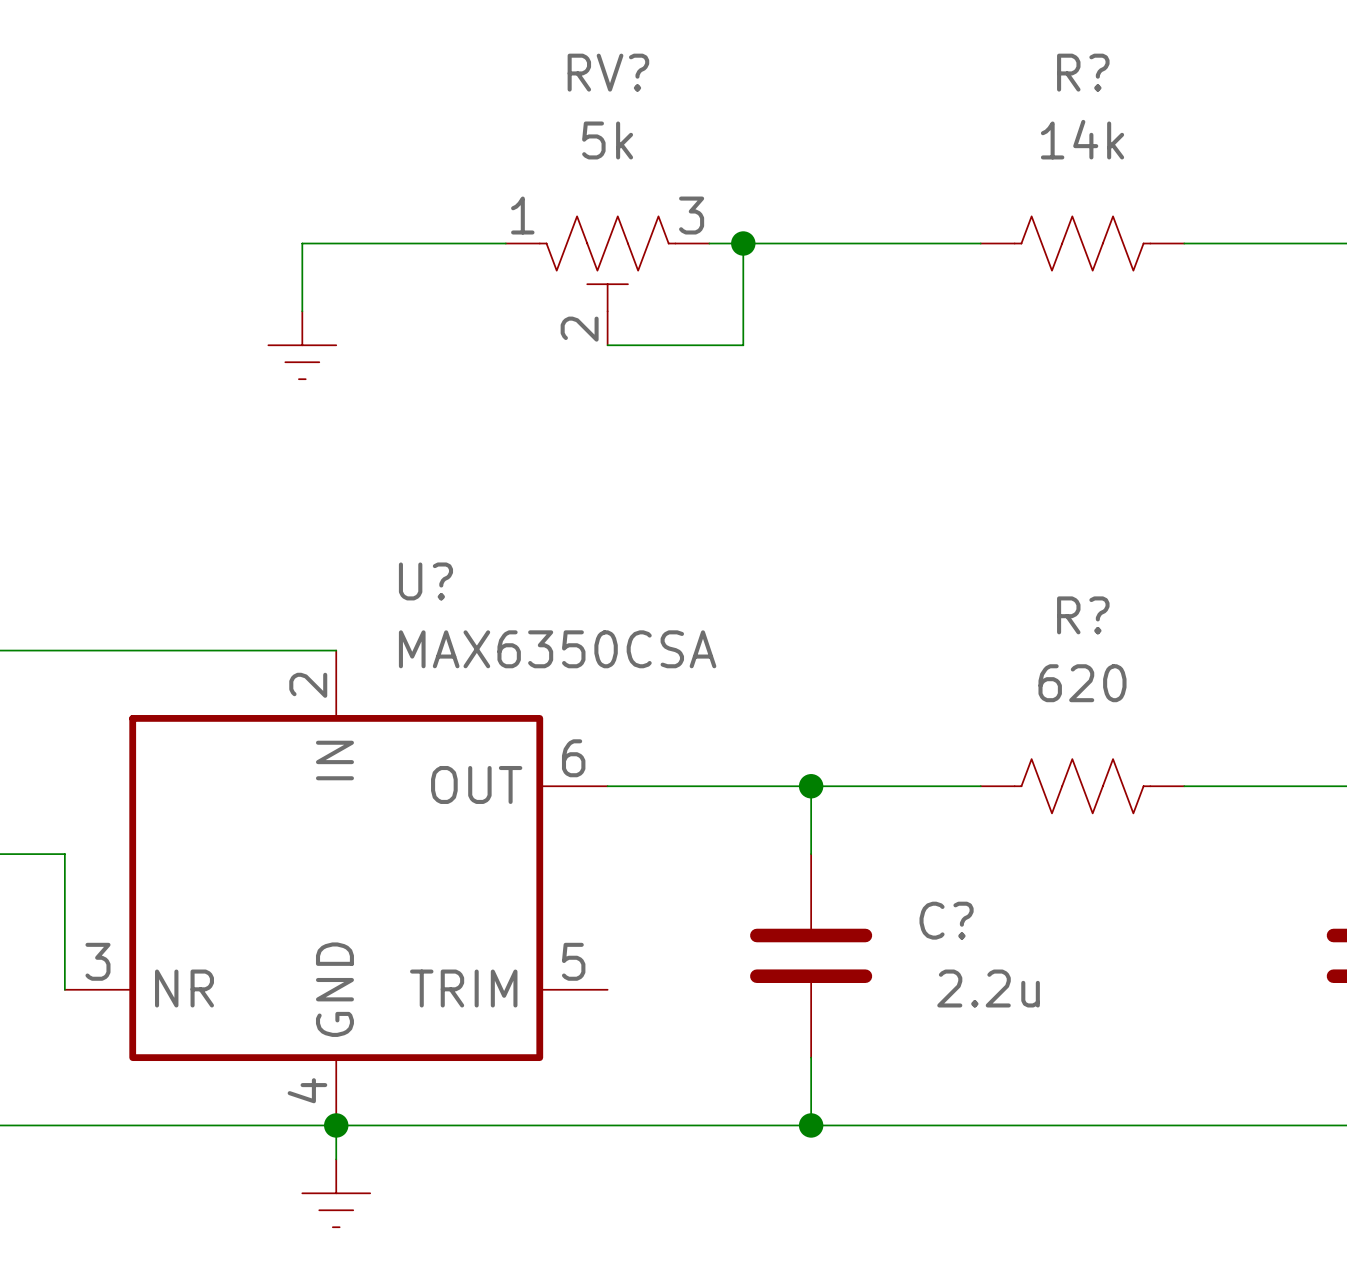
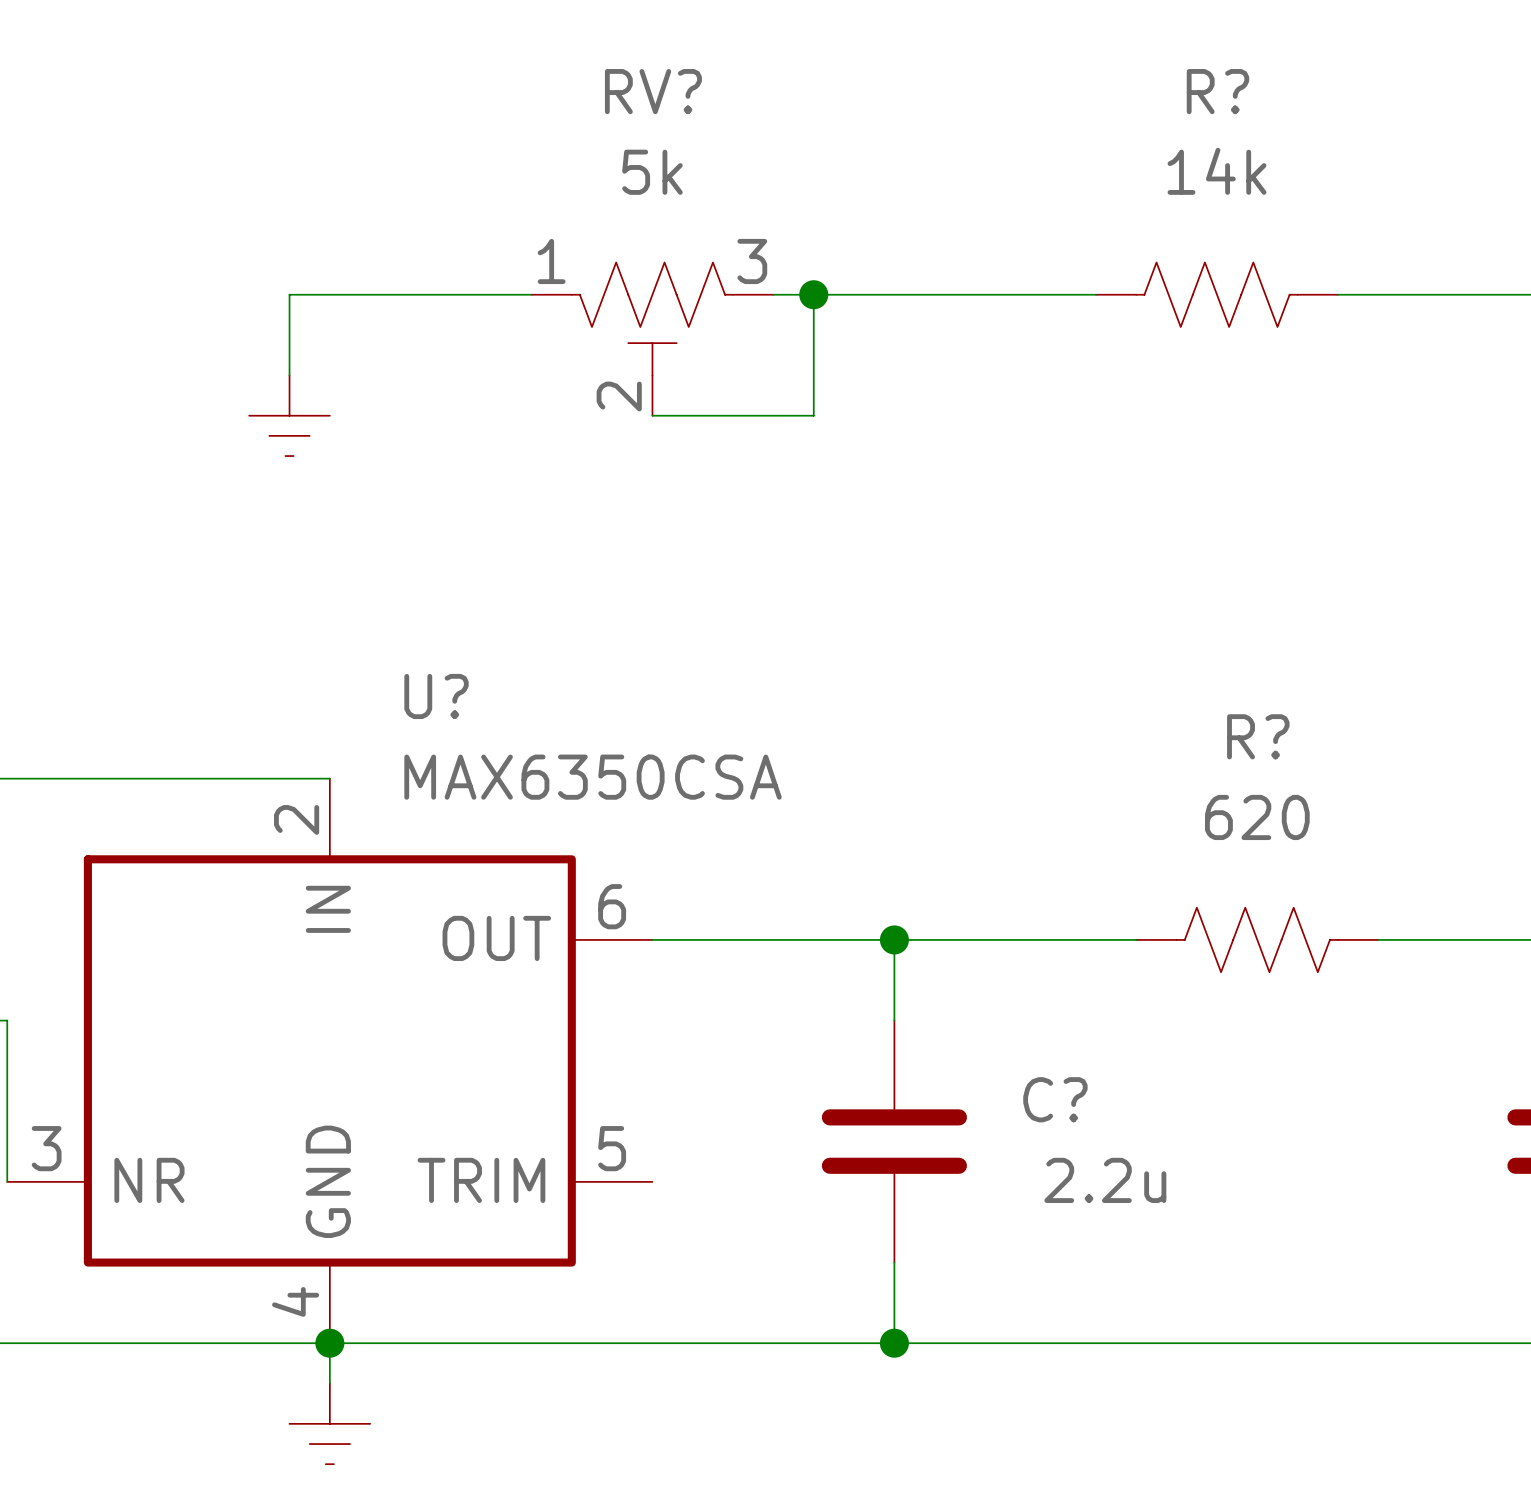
R? position: (1082, 786) -> (1257, 939)

